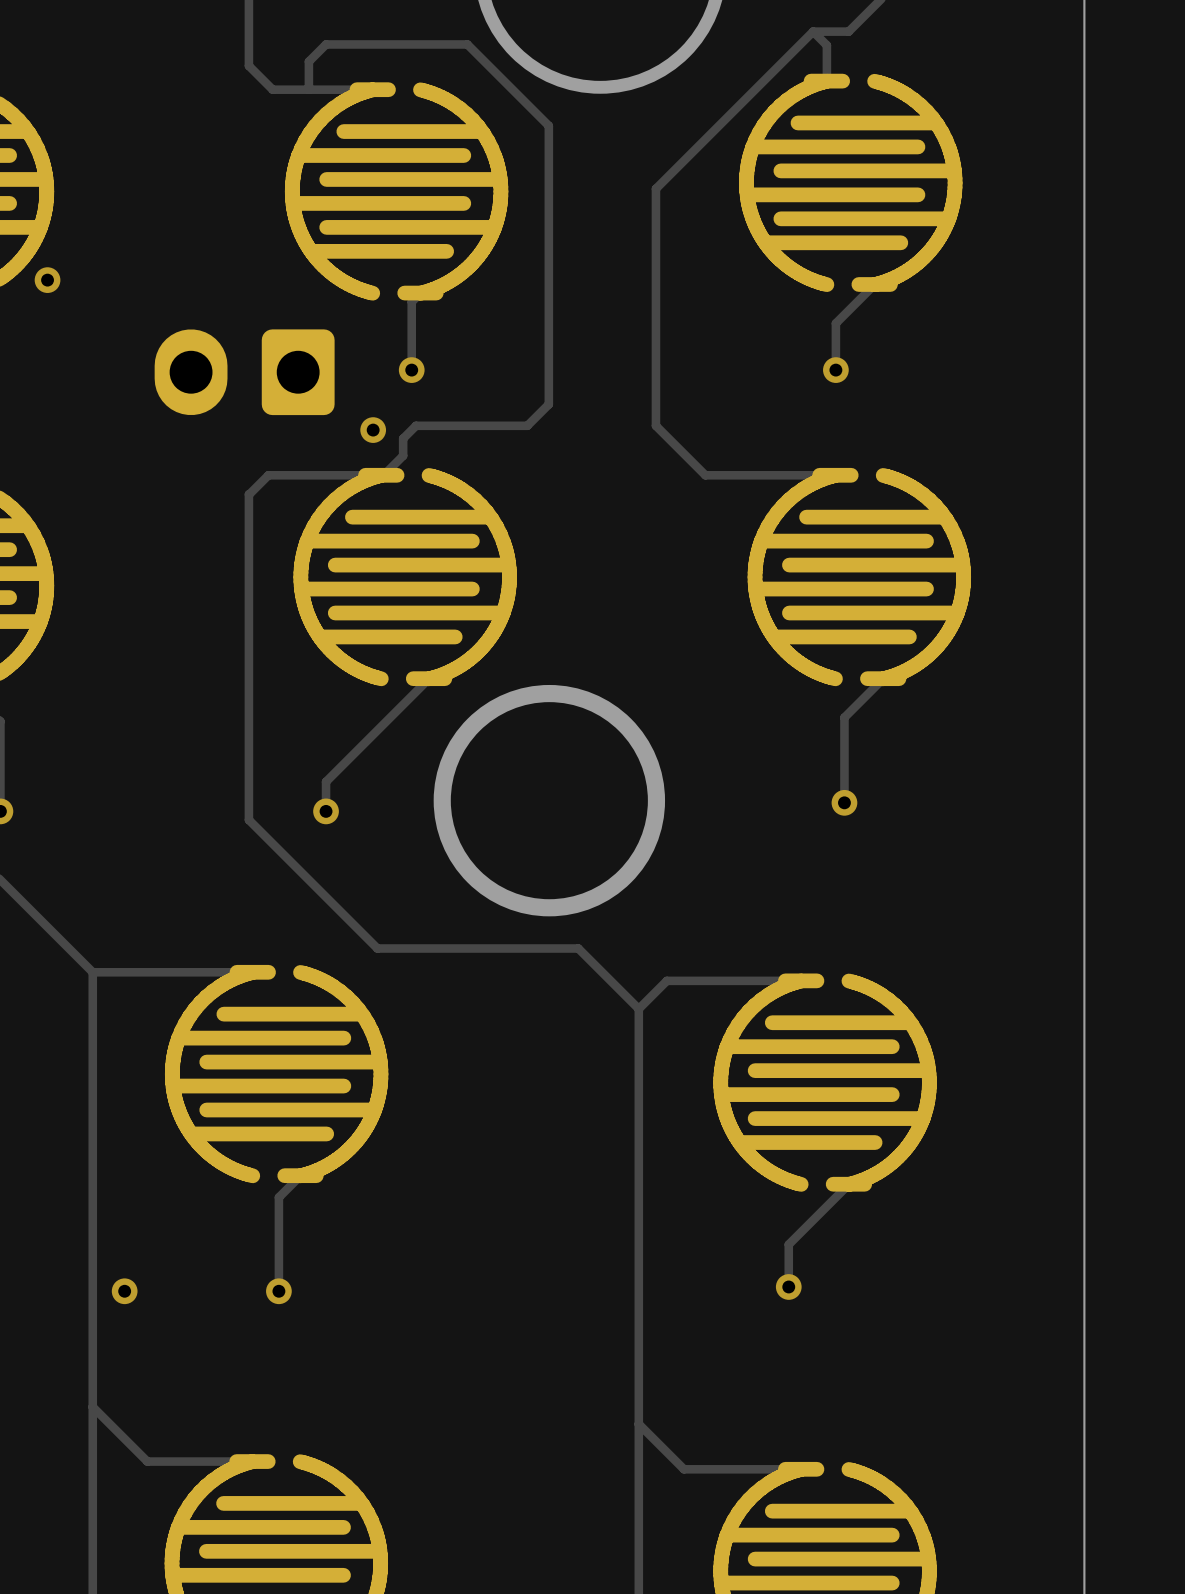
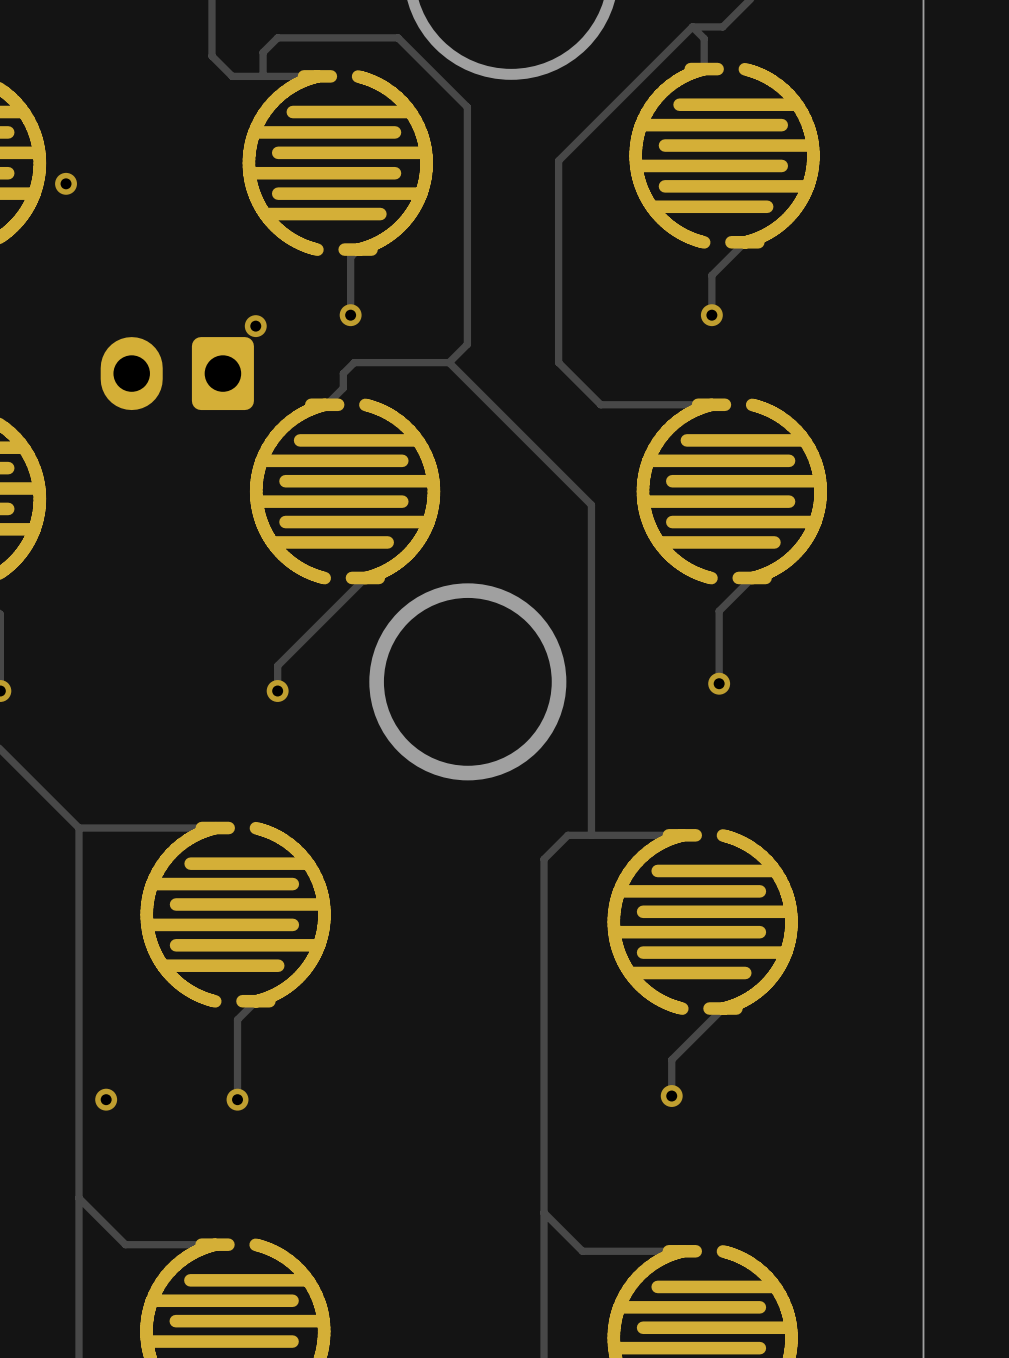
via position: (47, 280) -> (66, 183)
part position: (244, 372) -> (177, 373)
track: none -> (449, 362) (591, 504) (591, 835)
via position: (373, 430) -> (255, 326)
track: (381, 475) (268, 475) (249, 494) -> none
track: (248, 494) (248, 819) (377, 948) (578, 948) (638, 1008) -> none

